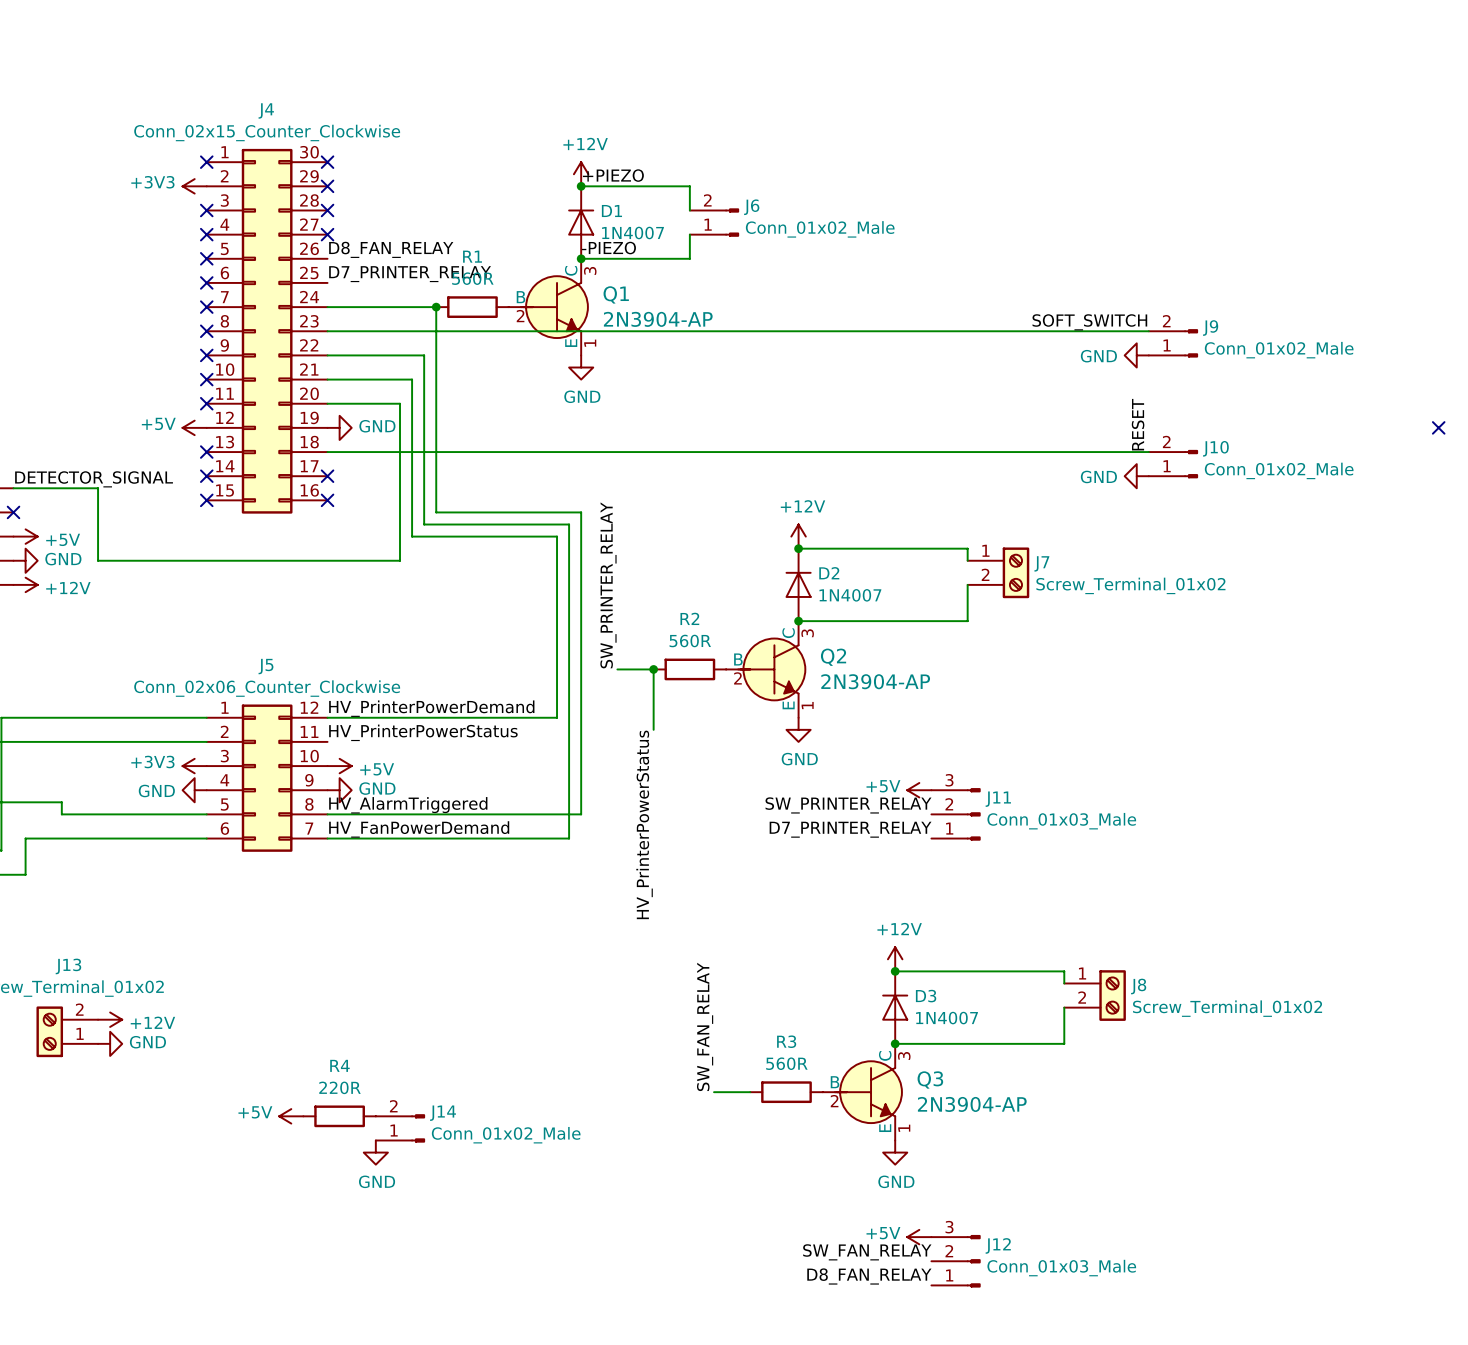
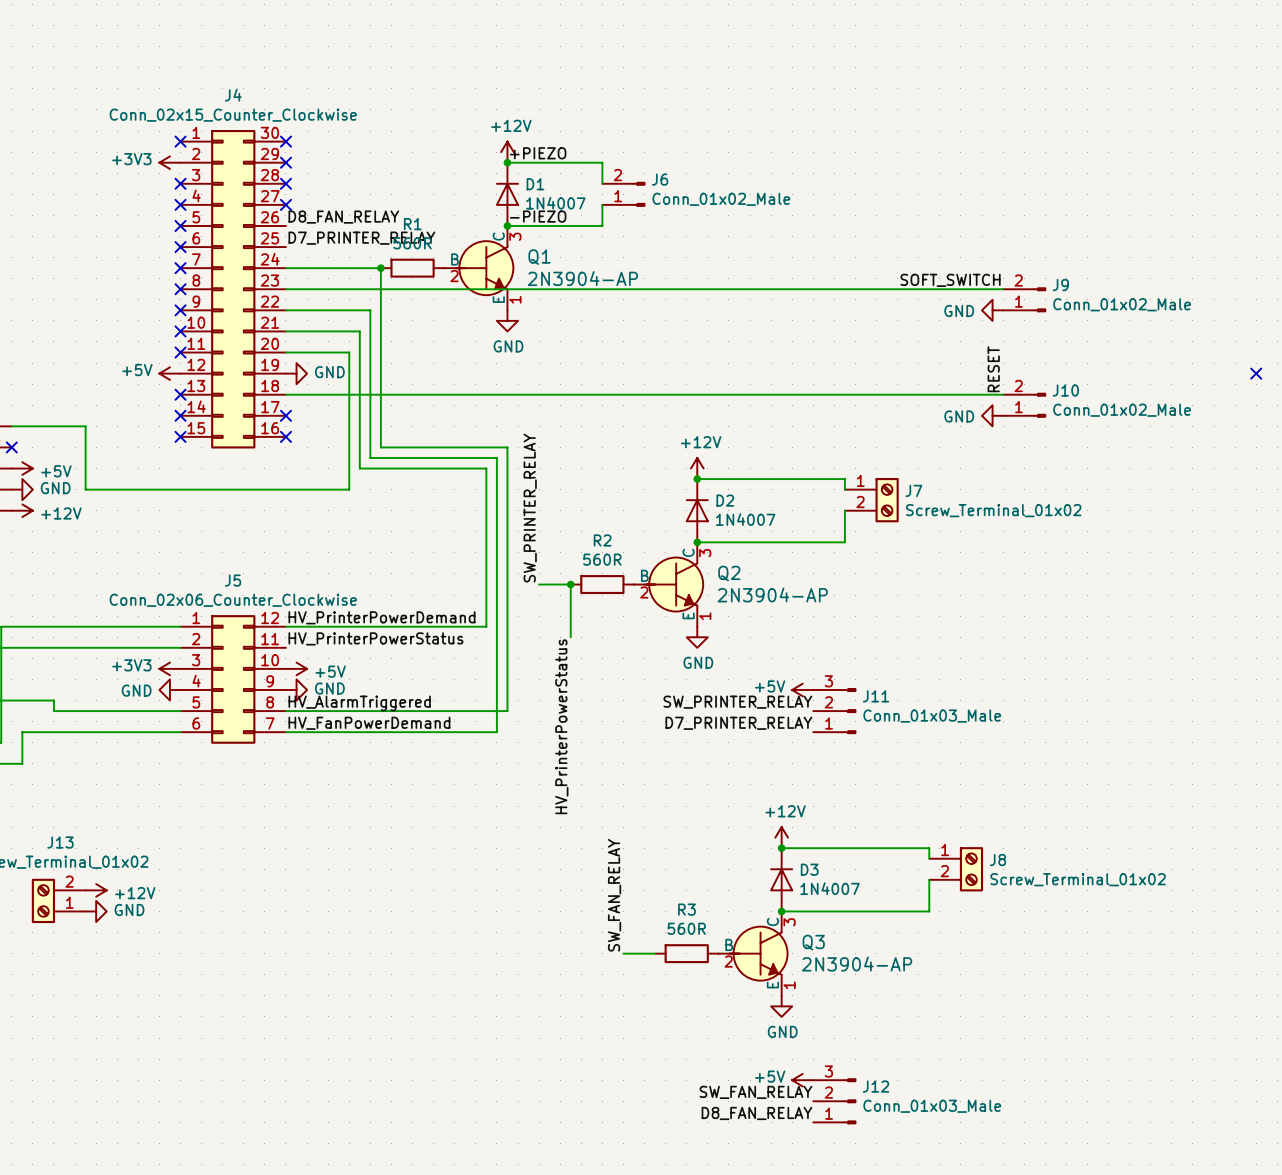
label: DETECTOR_SIGNAL (94, 479) -> none
power symbol: +5V (291, 1116) -> none
R4: 220R (339, 1116) -> none
J14: Conn_01x02_Male (400, 1128) -> none
power symbol: GND (375, 1152) -> none

